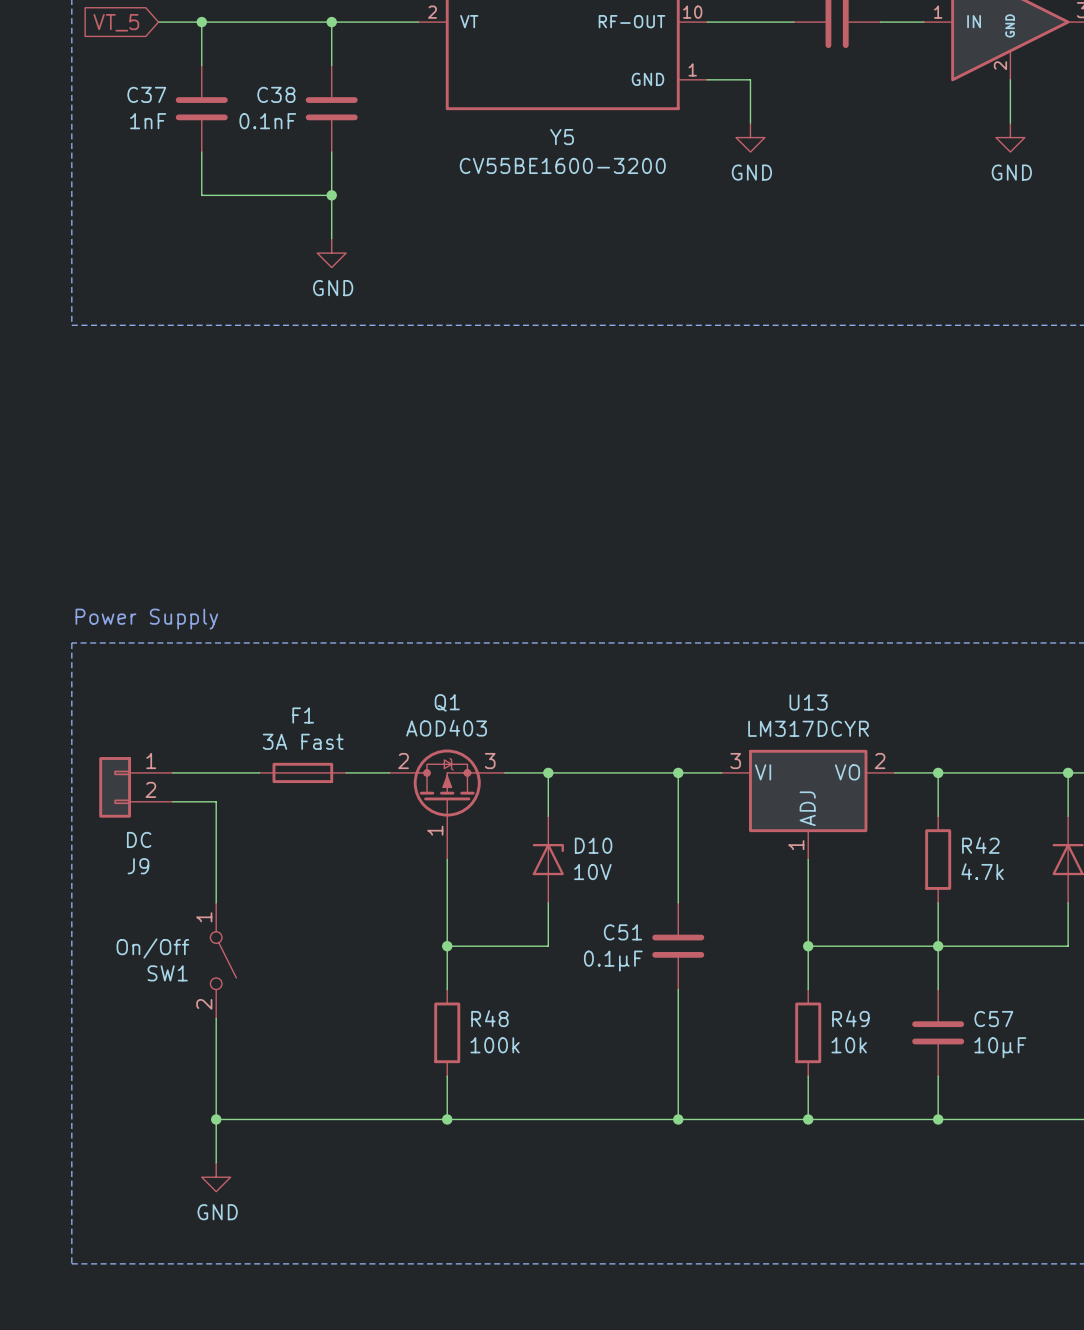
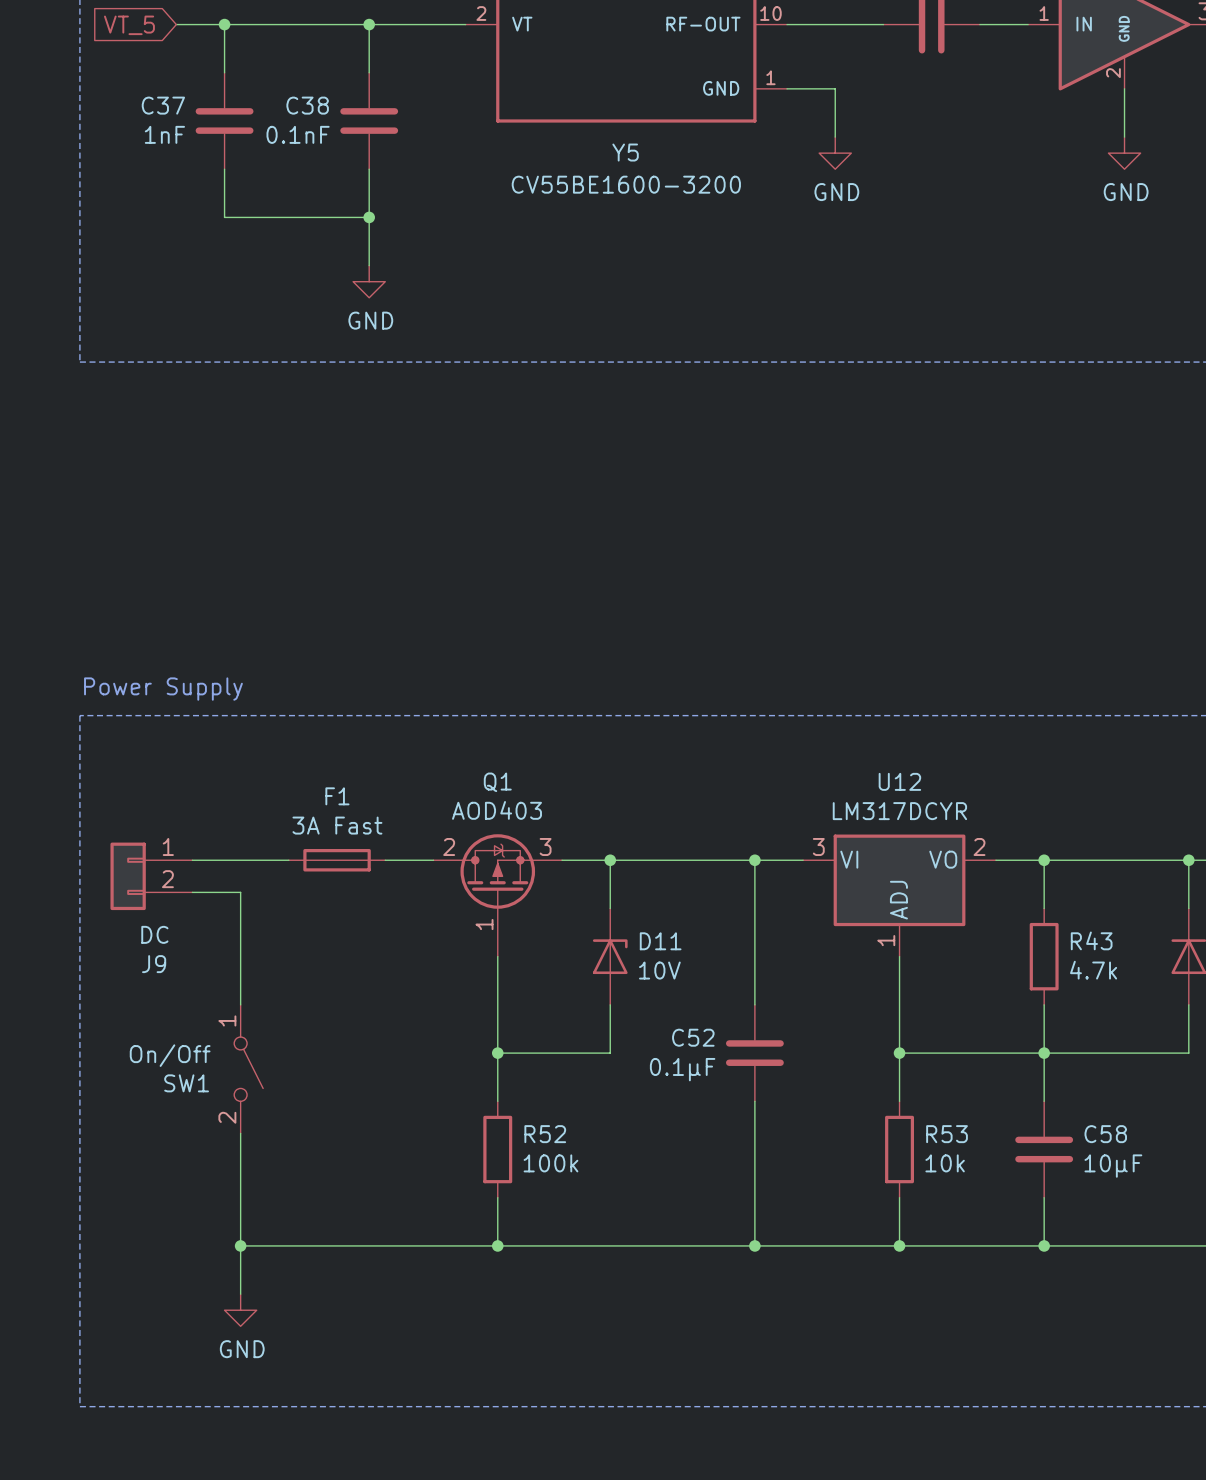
U13 name: U13 (808, 702) -> U12 (899, 781)
D10 name: D10 (593, 845) -> D11 (660, 941)
R42 name: R42 (980, 845) -> R43 (1091, 940)
C51 name: C51 (622, 932) -> C52 (693, 1037)
R48 name: R48 (489, 1018) -> R52 (545, 1134)
R49 name: R49 (850, 1018) -> R53 (947, 1134)
C57 name: C57 (993, 1019) -> C58 (1105, 1134)

